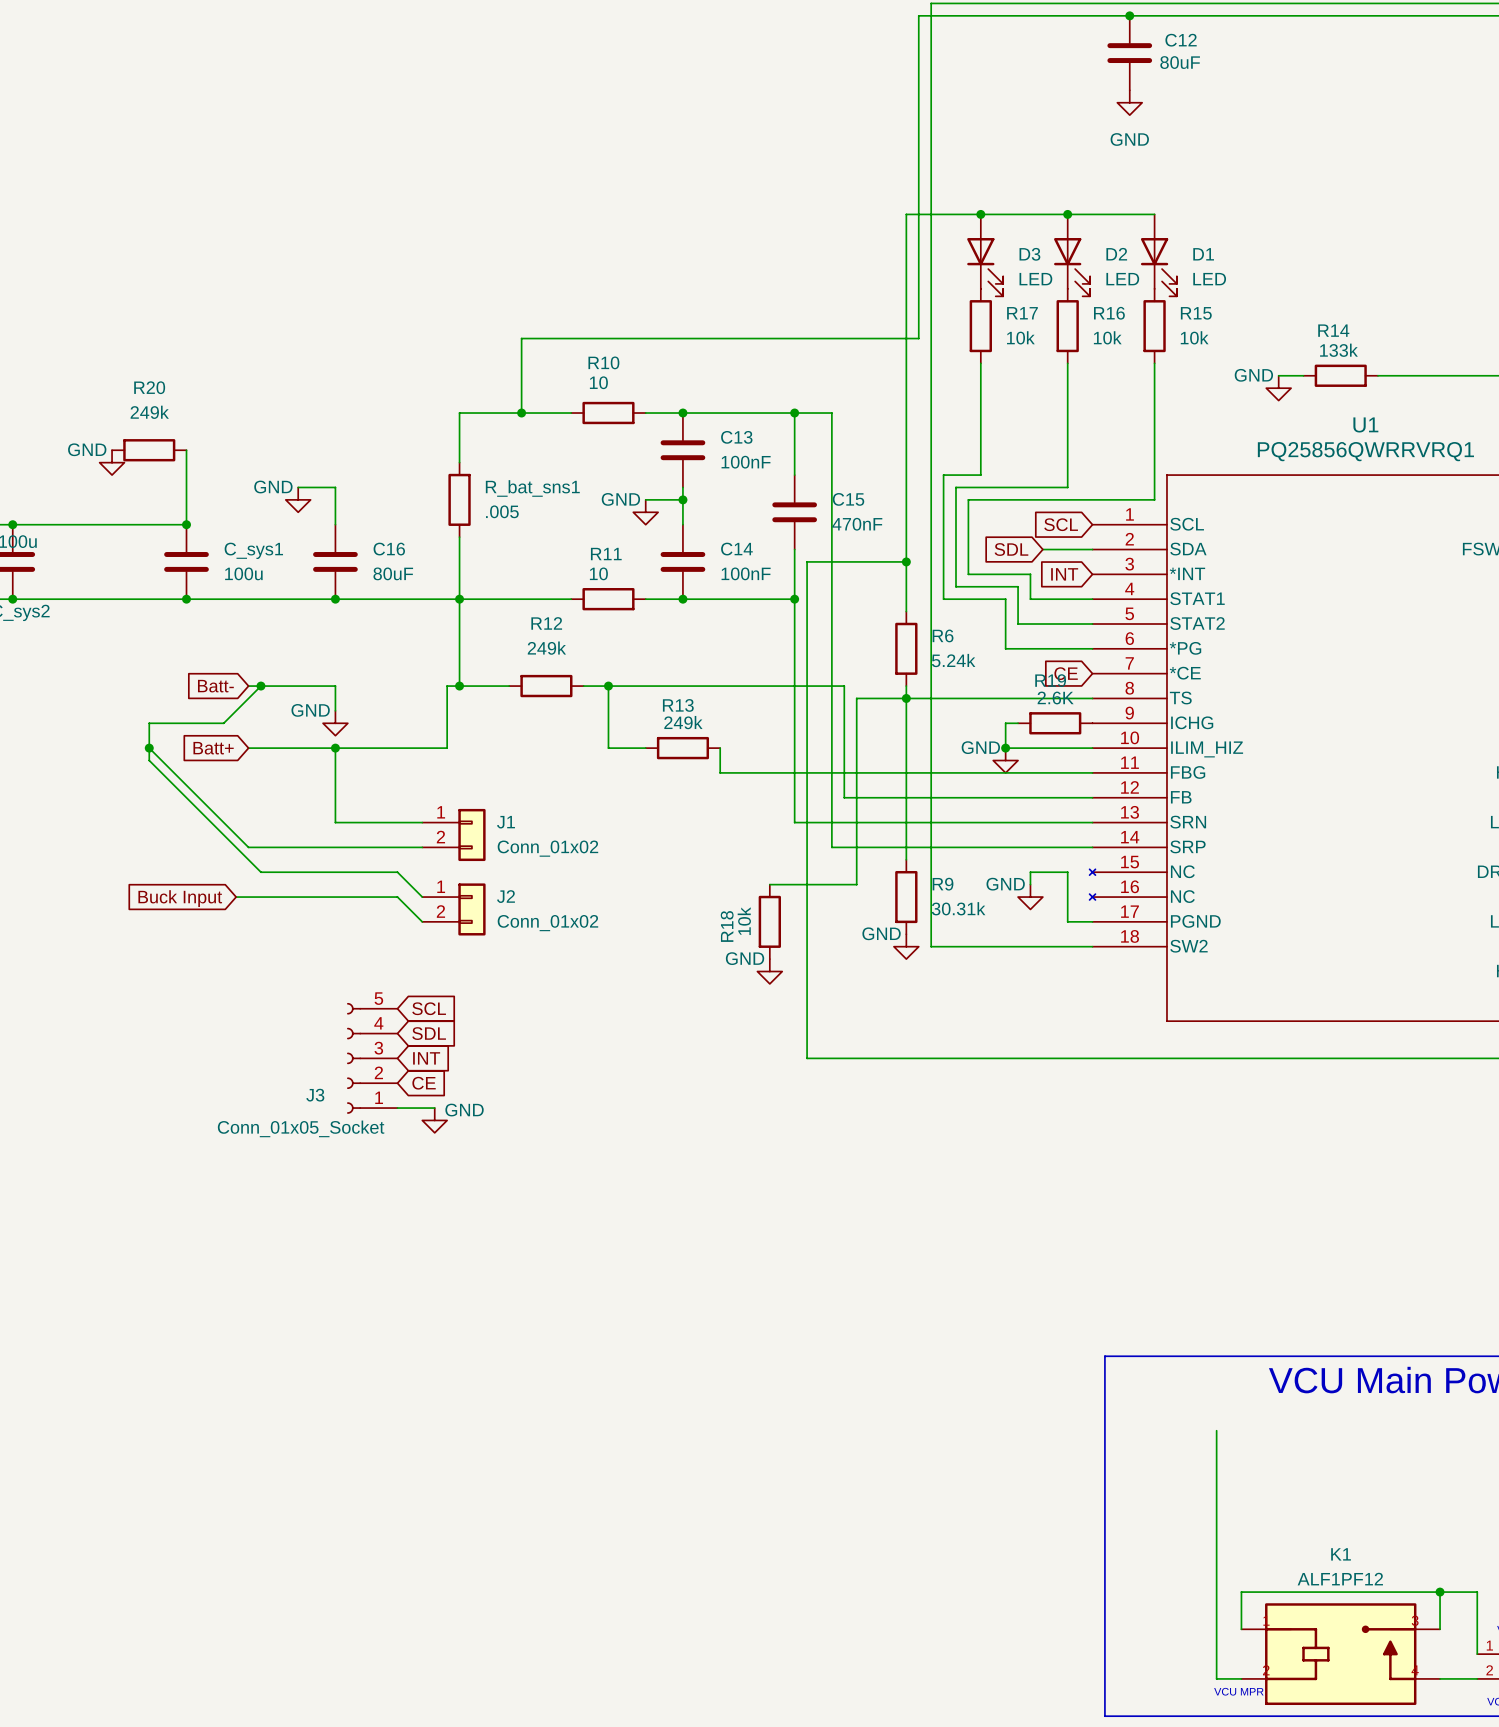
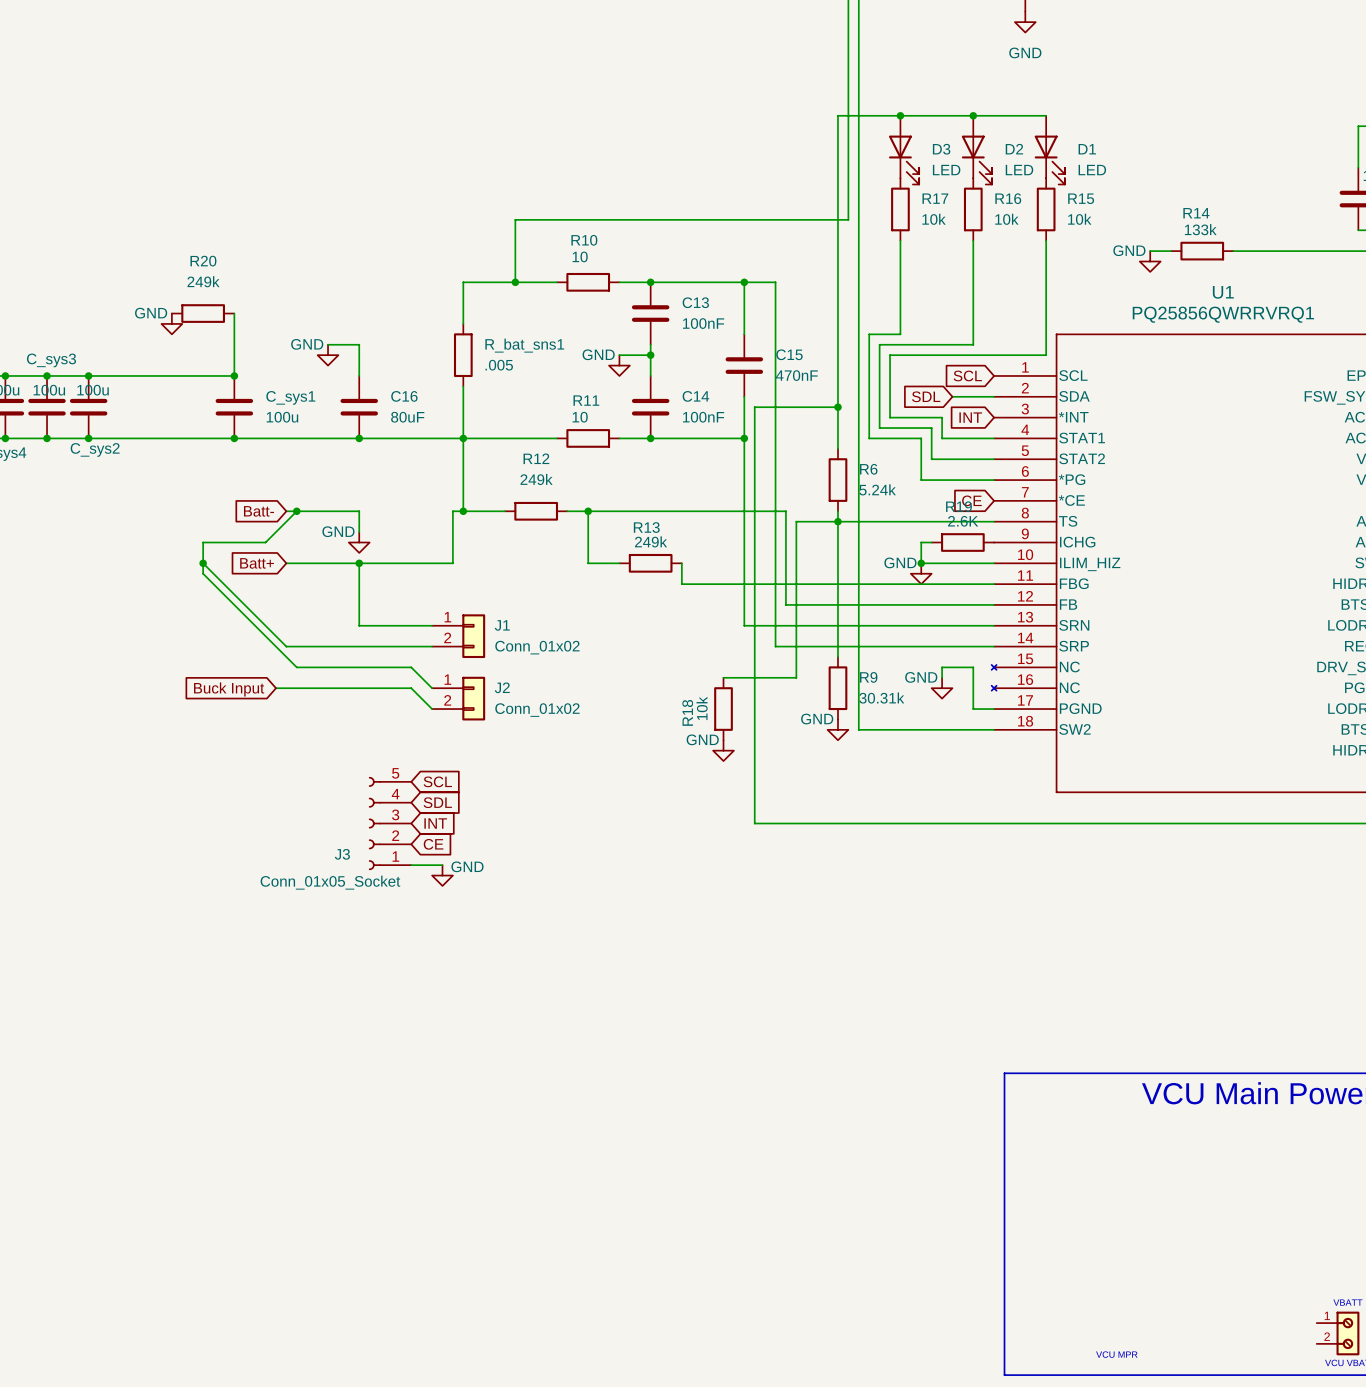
wire: (1216, 1430) (1216, 1678) (1241, 1678) -> none
wire: (1440, 1592) (1440, 1629) -> none
junction: (1440, 1592) -> none
wire: (1241, 1629) (1241, 1592) (1477, 1592) (1477, 1654) -> none
K1: ALF1PF12 (1340, 1654) -> none
wire: (1440, 1678) (1477, 1678) -> none

